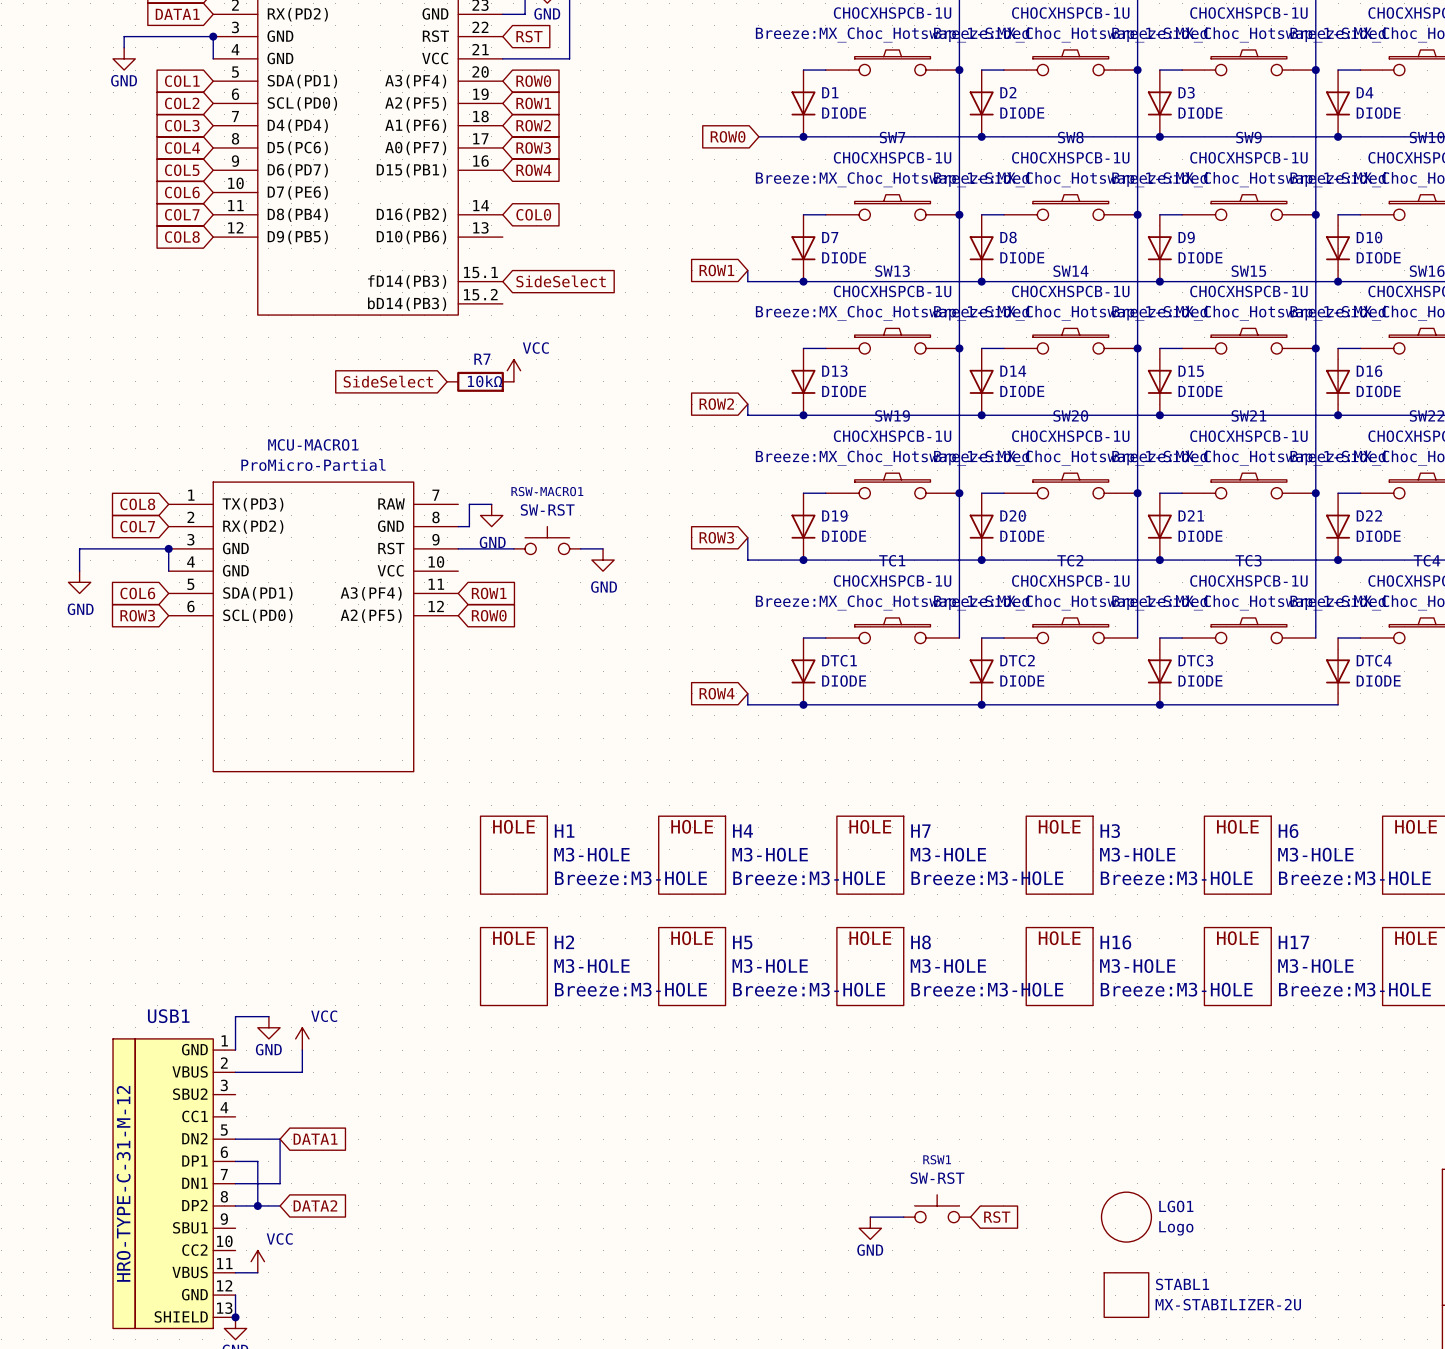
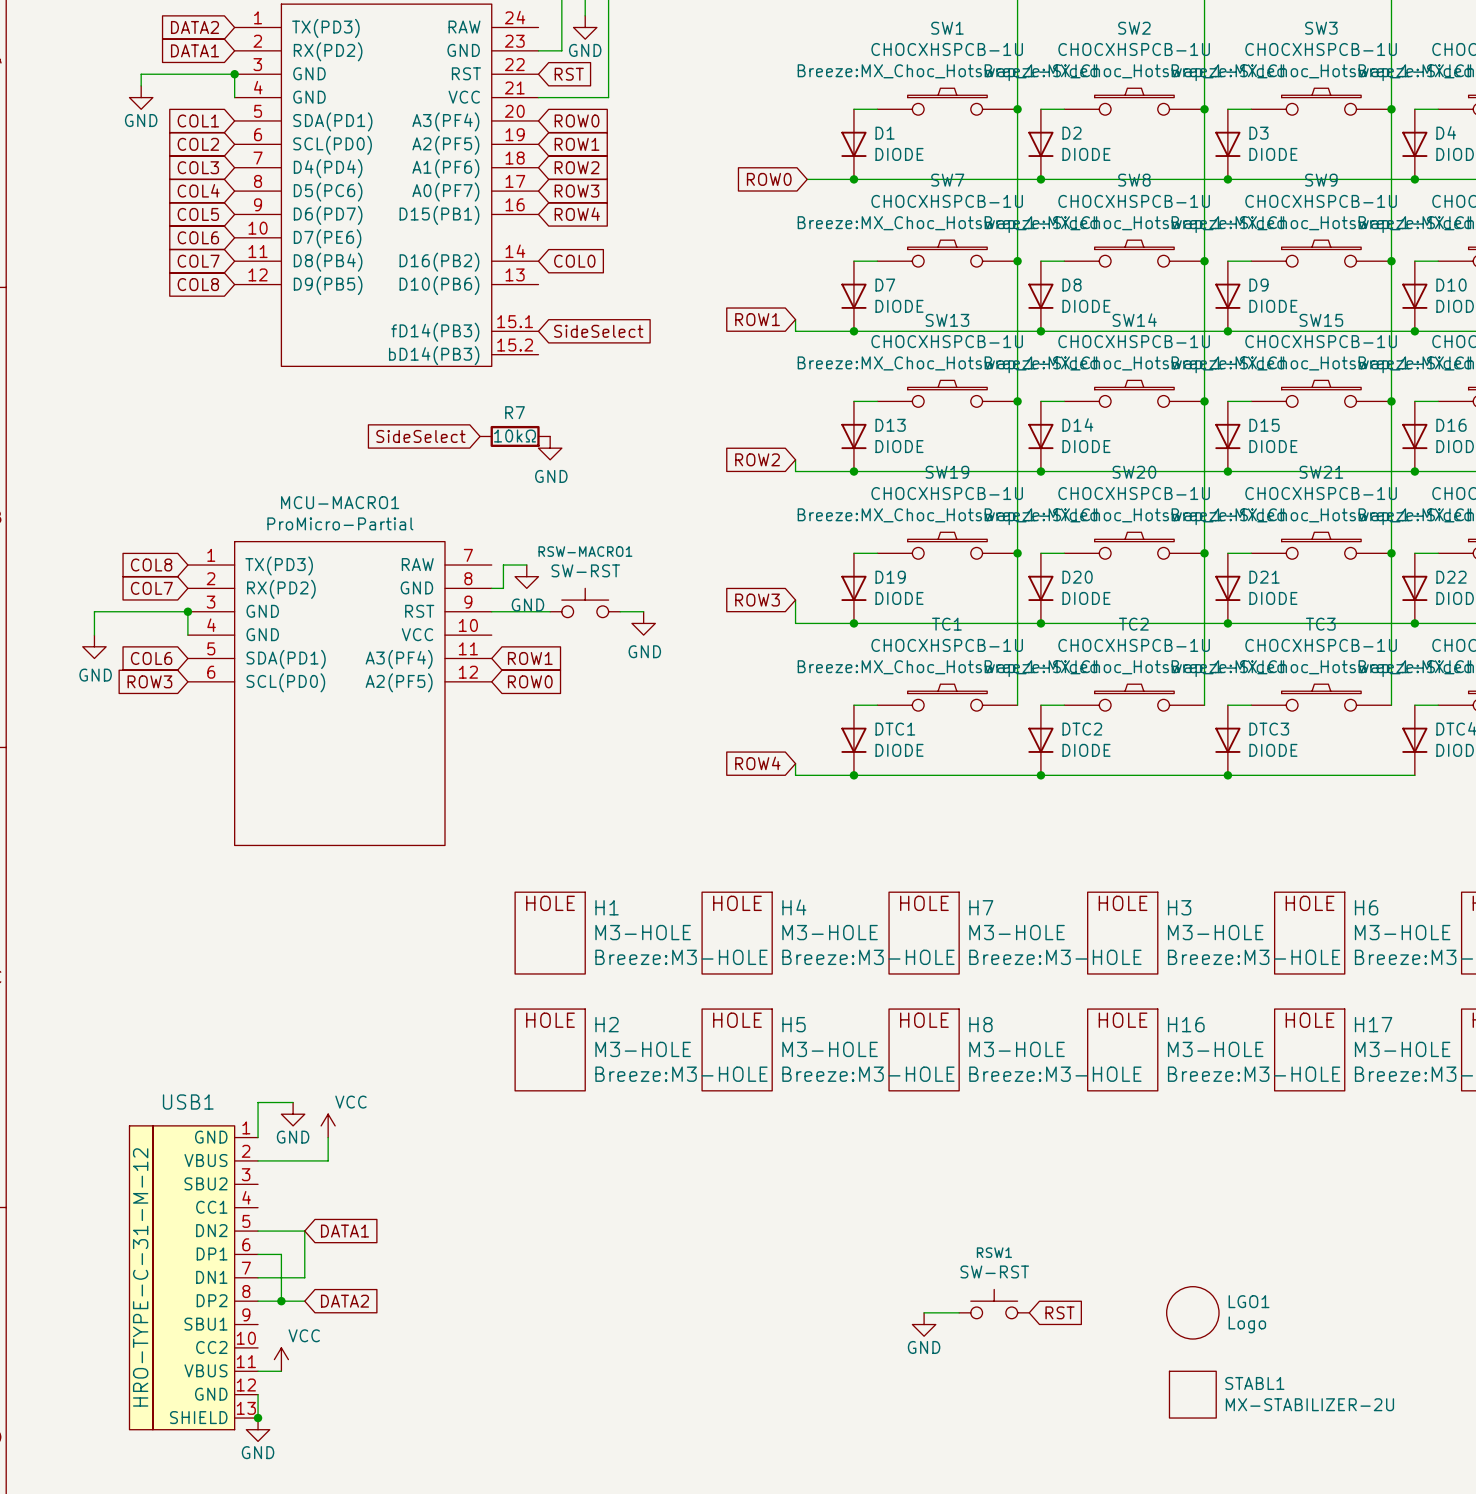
power symbol: VCC (513, 370) -> none
power symbol: none -> GND (550, 448)

